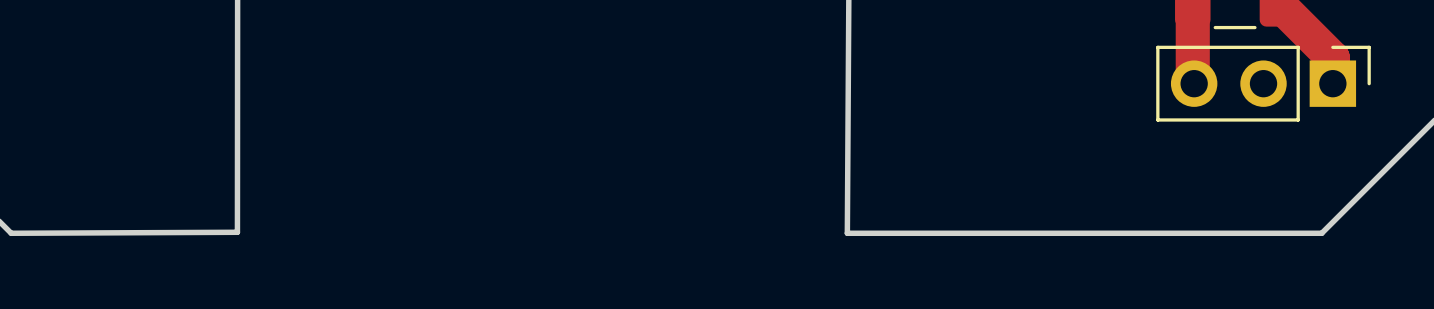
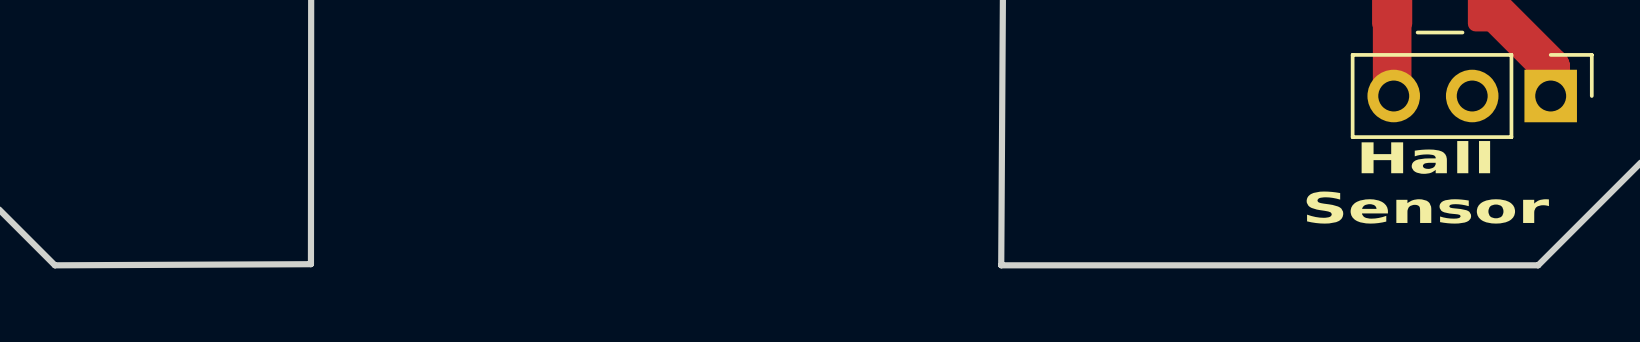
text: none -> Hall (1425, 157)
text: none -> Sensor (1427, 207)

